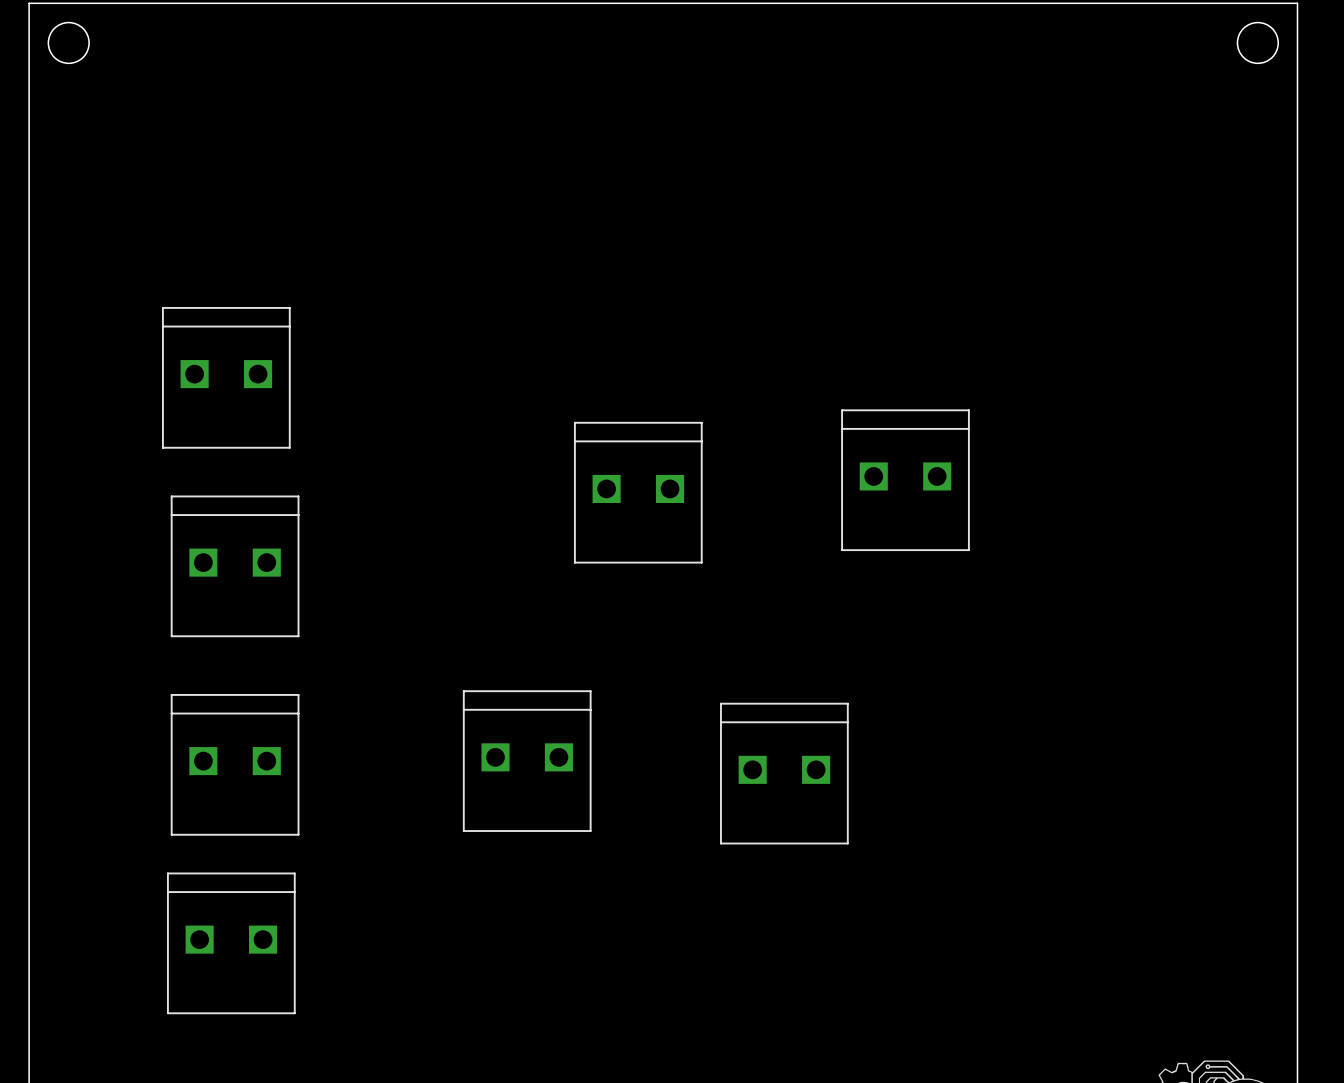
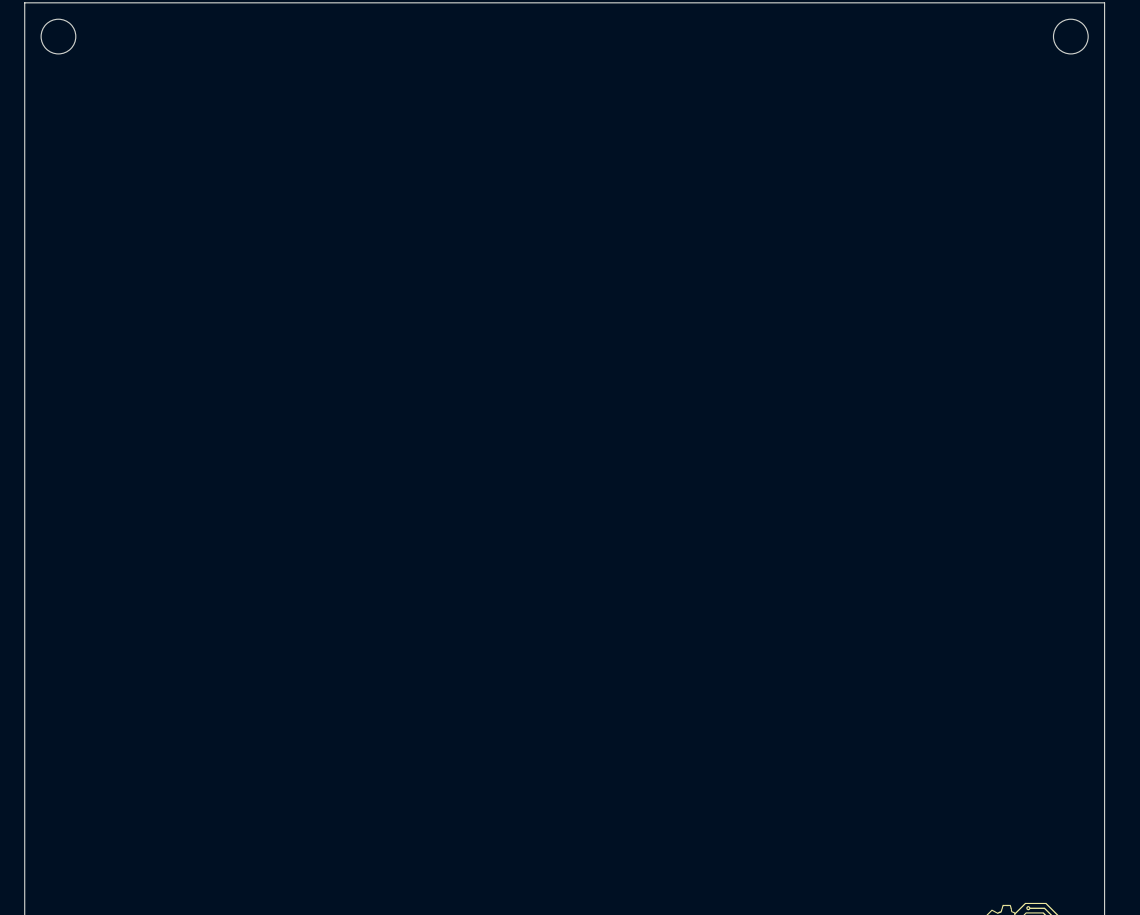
part: (226, 377) -> none
part: (905, 480) -> none
part: (638, 492) -> none
part: (235, 566) -> none
part: (527, 761) -> none
part: (235, 764) -> none
part: (784, 773) -> none
part: (231, 943) -> none

